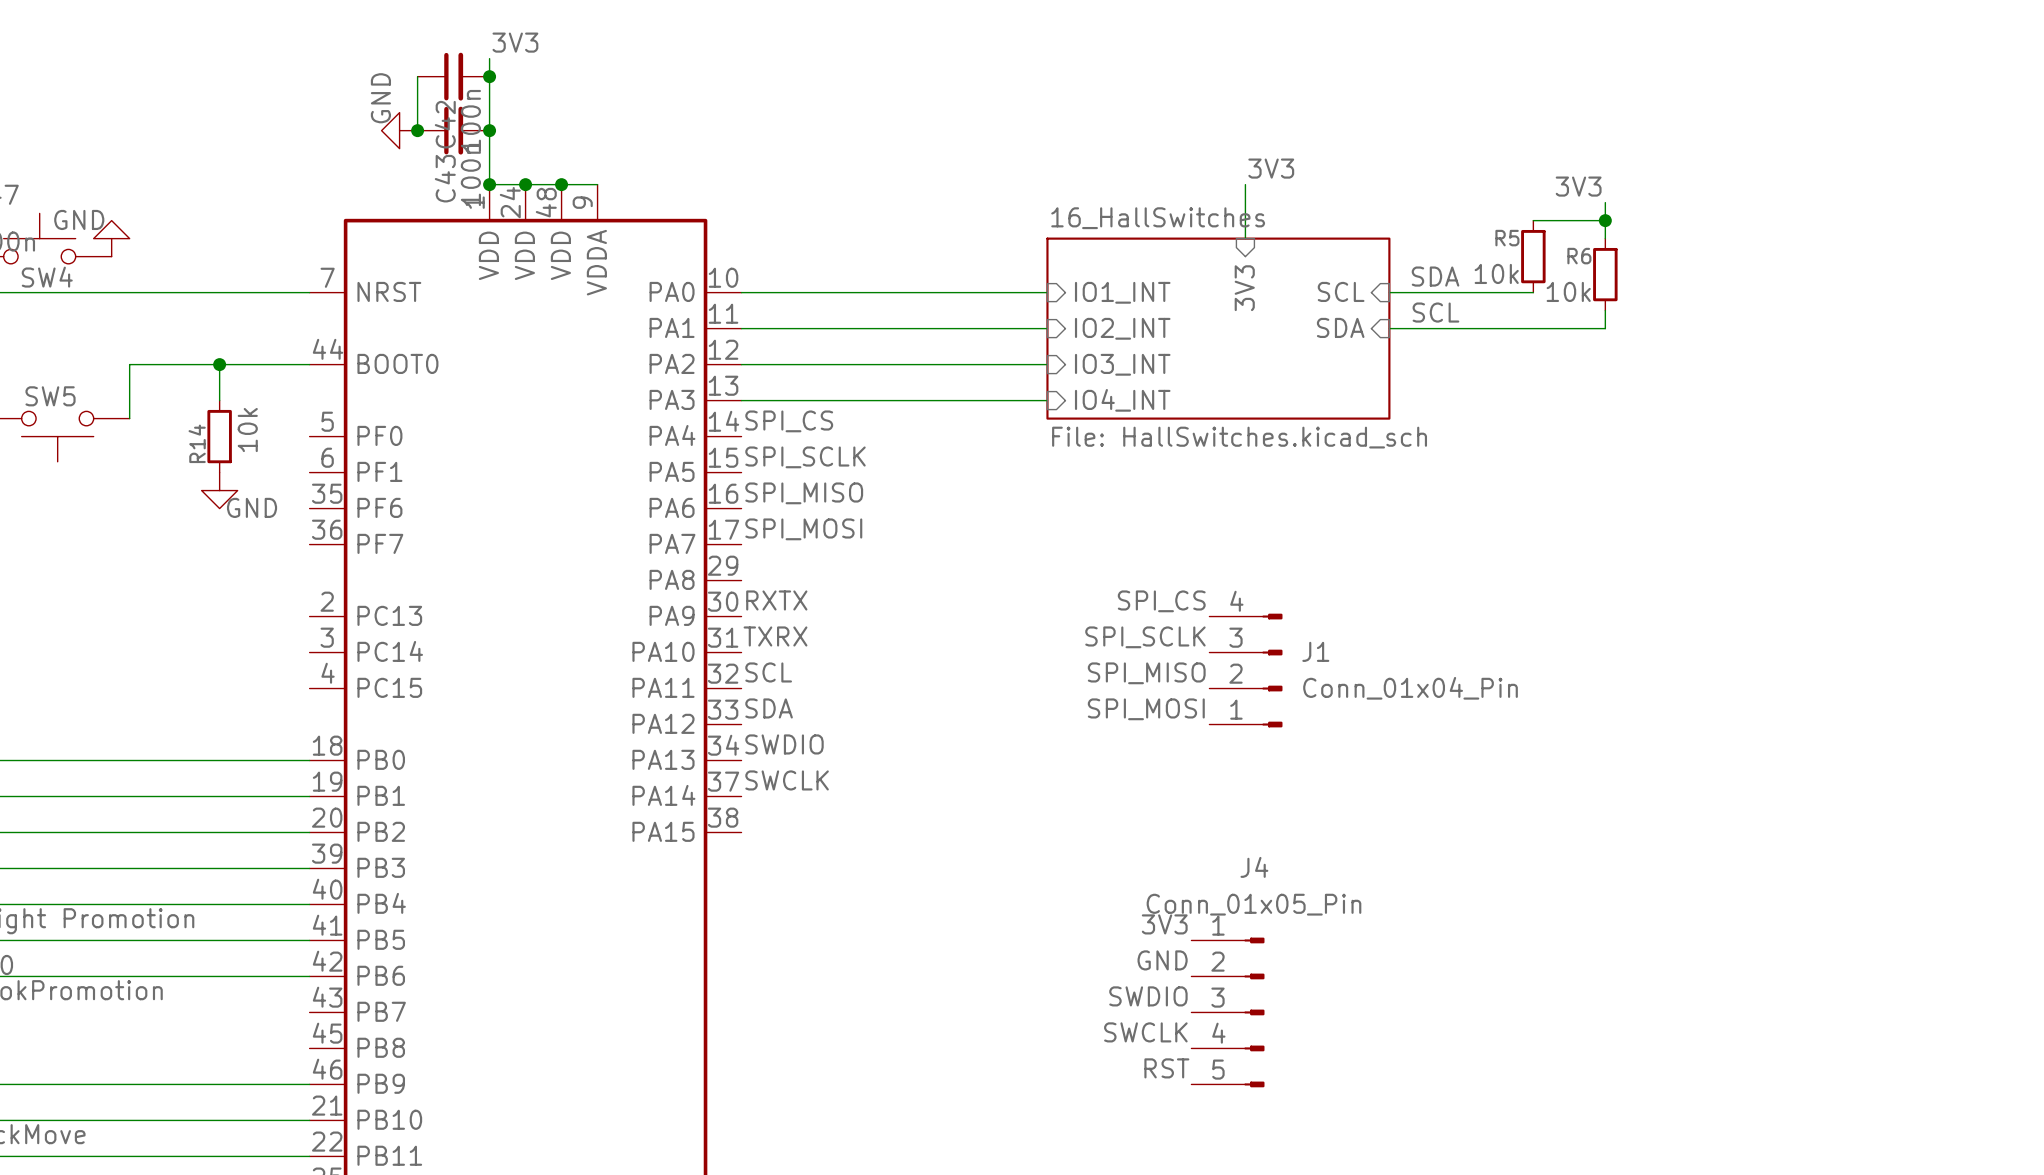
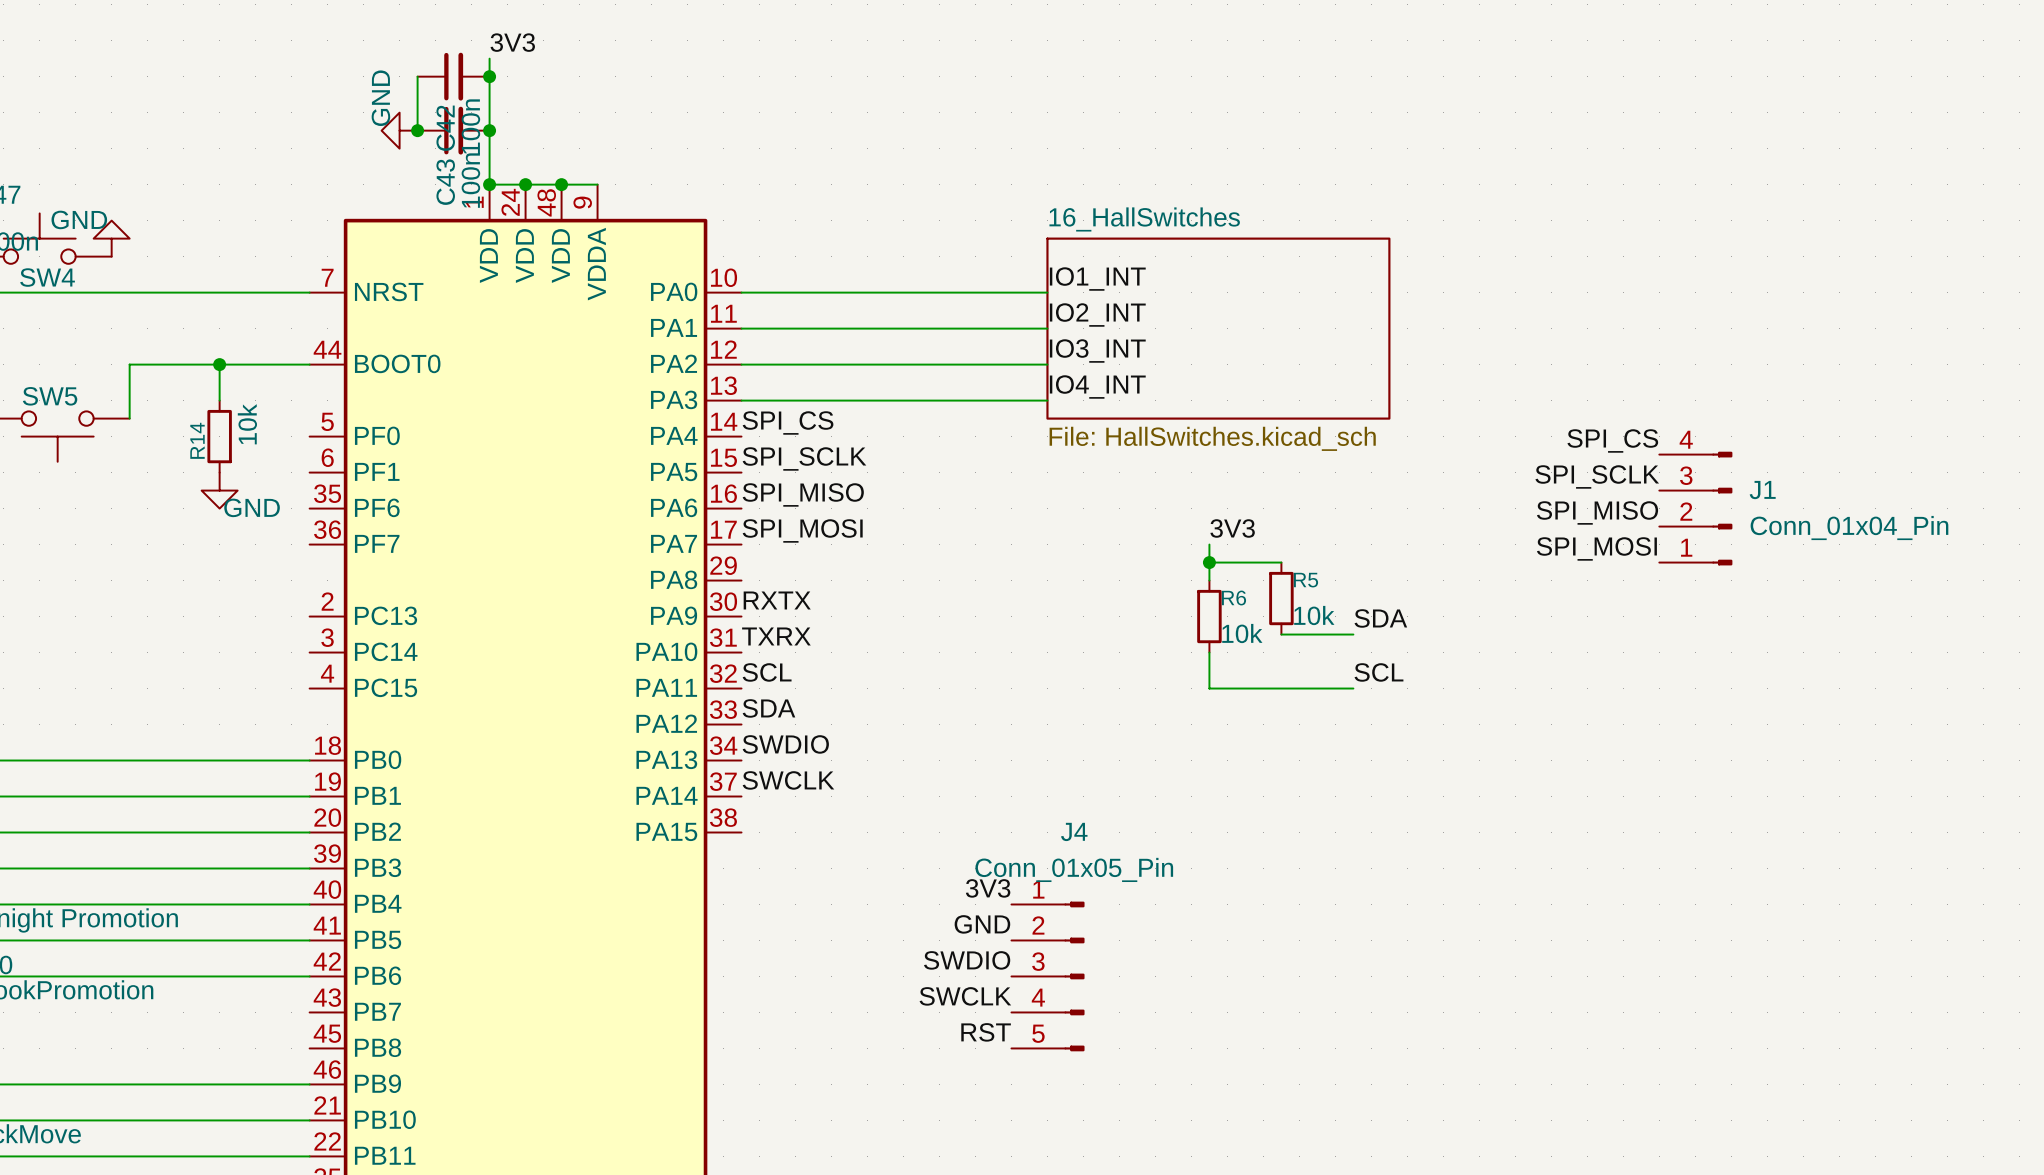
label: 3V3 (1271, 168) -> none
wire: (1245, 184) (1245, 238) -> none
label: 3V3 (1578, 186) -> none
wire: (1605, 202) (1605, 238) -> none
wire: (1533, 220) (1605, 220) -> none
junction: (1605, 220) -> none
R5 name position: R5 (1507, 238) -> R5 (1306, 580)
R5 position: (1533, 256) -> (1281, 598)
R6 name position: R6 (1579, 256) -> R6 (1233, 598)
R5 value position: 10k (1496, 273) -> 10k (1314, 615)
R6 position: (1605, 274) -> (1209, 616)
label: SDA (1435, 276) -> none
label: none -> IO1_INT (1097, 279)
sheet pin: 3V3 (1244, 288) -> none
sheet pin: SCL (1341, 291) -> none
R6 value position: 10k (1568, 291) -> 10k (1242, 633)
sheet pin: IO1_INT (1122, 292) -> none
wire: (1389, 292) (1533, 292) -> none
wire: (1605, 310) (1605, 328) (1389, 328) -> none
label: SCL (1435, 312) -> none
label: none -> IO2_INT (1097, 315)
sheet pin: SDA (1340, 327) -> none
sheet pin: IO2_INT (1122, 328) -> none
label: none -> IO3_INT (1097, 351)
sheet pin: IO3_INT (1122, 364) -> none
label: none -> IO4_INT (1097, 386)
sheet pin: IO4_INT (1122, 400) -> none
label: none -> SPI_CS (1612, 440)
label: none -> SPI_SCLK (1597, 476)
label: none -> SPI_MISO (1597, 512)
label: none -> 3V3 (1232, 528)
wire: none -> (1209, 544) (1209, 580)
label: none -> SPI_MOSI (1596, 548)
wire: none -> (1209, 562) (1281, 562)
junction: none -> (1209, 562)
label: SPI_CS (1161, 601) -> none
label: none -> SDA (1380, 618)
wire: none -> (1281, 634) (1353, 634)
label: SPI_SCLK (1145, 637) -> none
wire: none -> (1209, 652) (1209, 688) (1353, 688)
J1 position: (1245, 670) -> (1695, 508)
label: none -> SCL (1379, 672)
label: SPI_MISO (1146, 673) -> none
label: SPI_MOSI (1146, 709) -> none
label position: 3V3 (1164, 924) -> 3V3 (988, 888)
label position: GND (1162, 960) -> GND (982, 924)
label position: SWDIO (1148, 996) -> SWDIO (967, 960)
J4 position: (1227, 1012) -> (1048, 976)
label position: SWCLK (1145, 1032) -> SWCLK (965, 996)
label position: RST (1166, 1068) -> RST (986, 1032)

